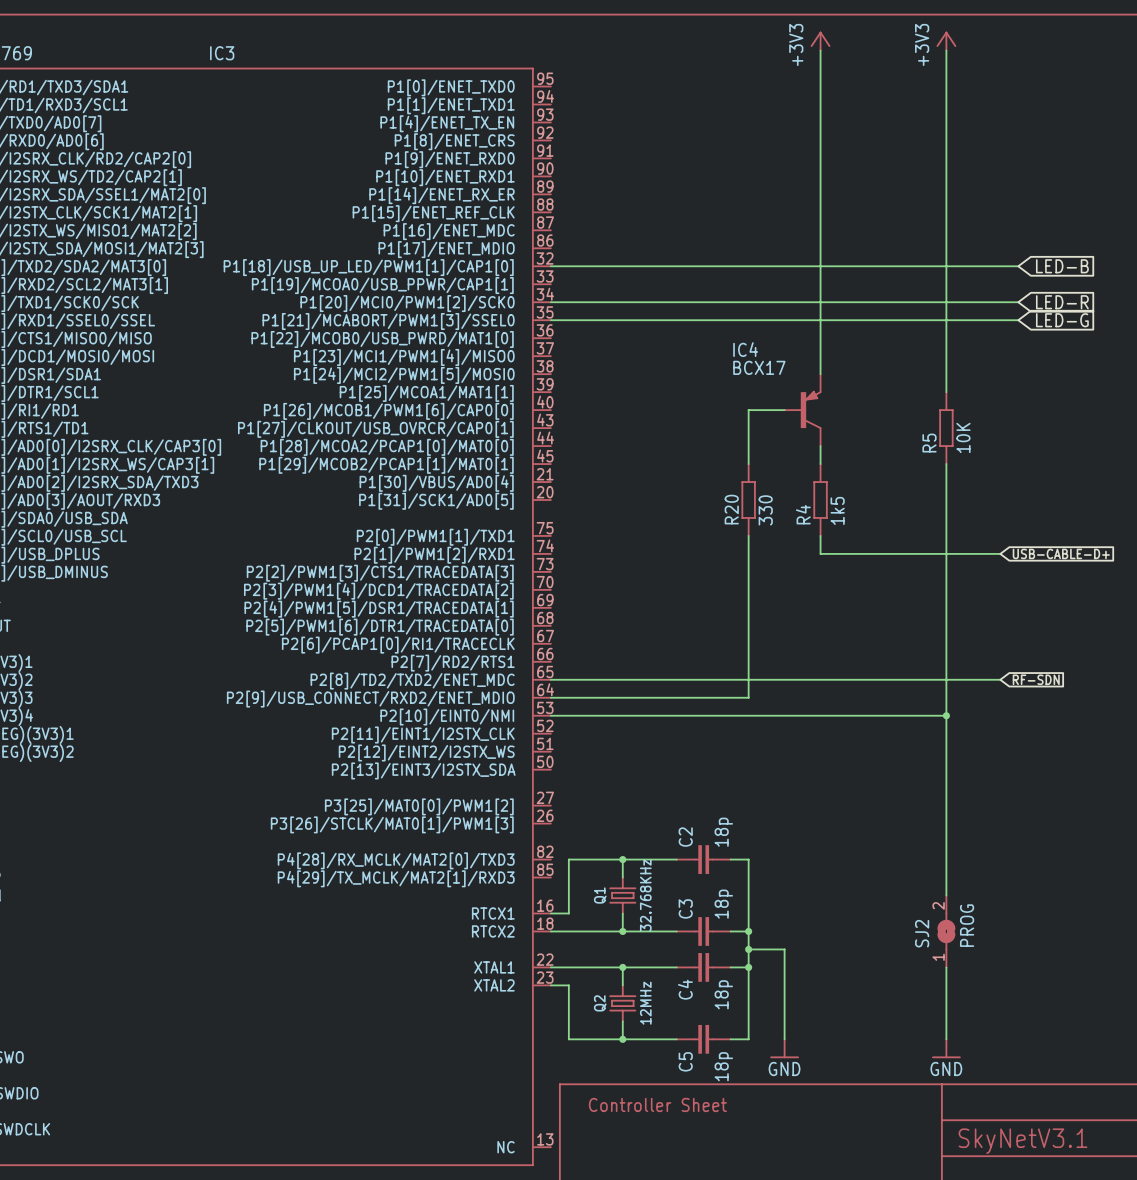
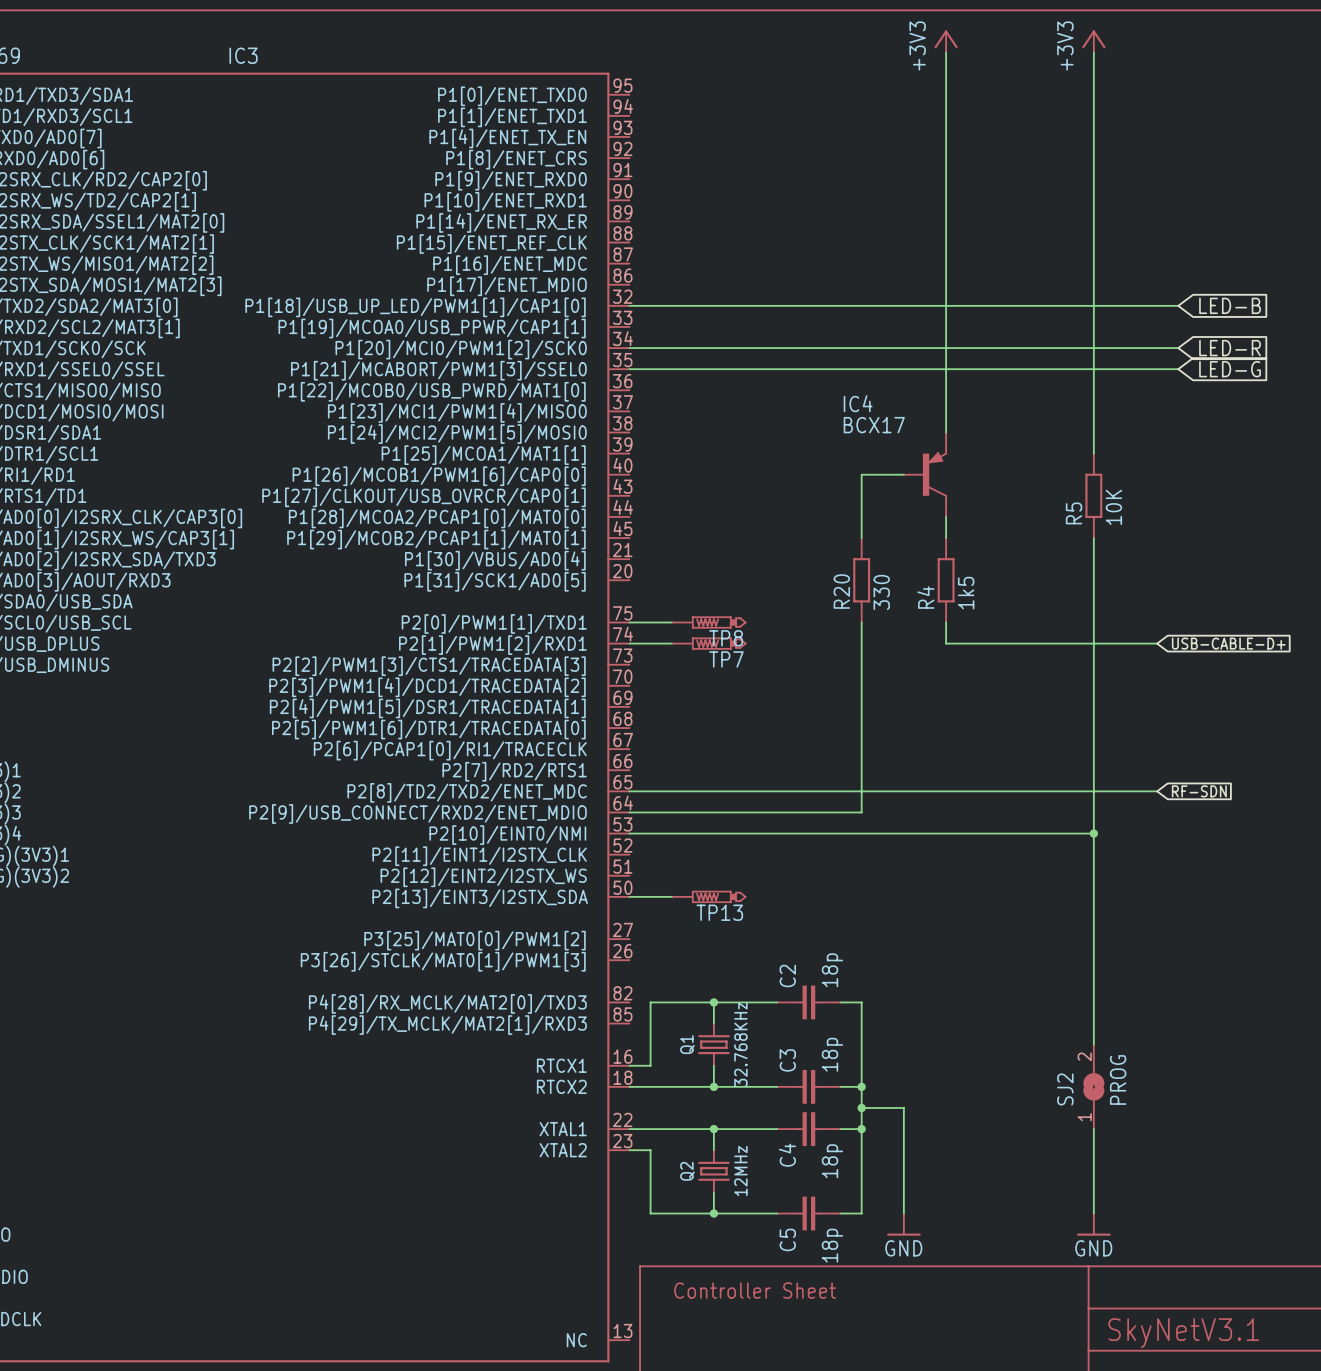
wire: none -> (629, 622) (671, 622)
TP8: none -> (708, 622)
wire: none -> (629, 643) (671, 643)
TP7: none -> (708, 643)
wire: none -> (629, 896) (671, 896)
TP13: none -> (708, 896)

